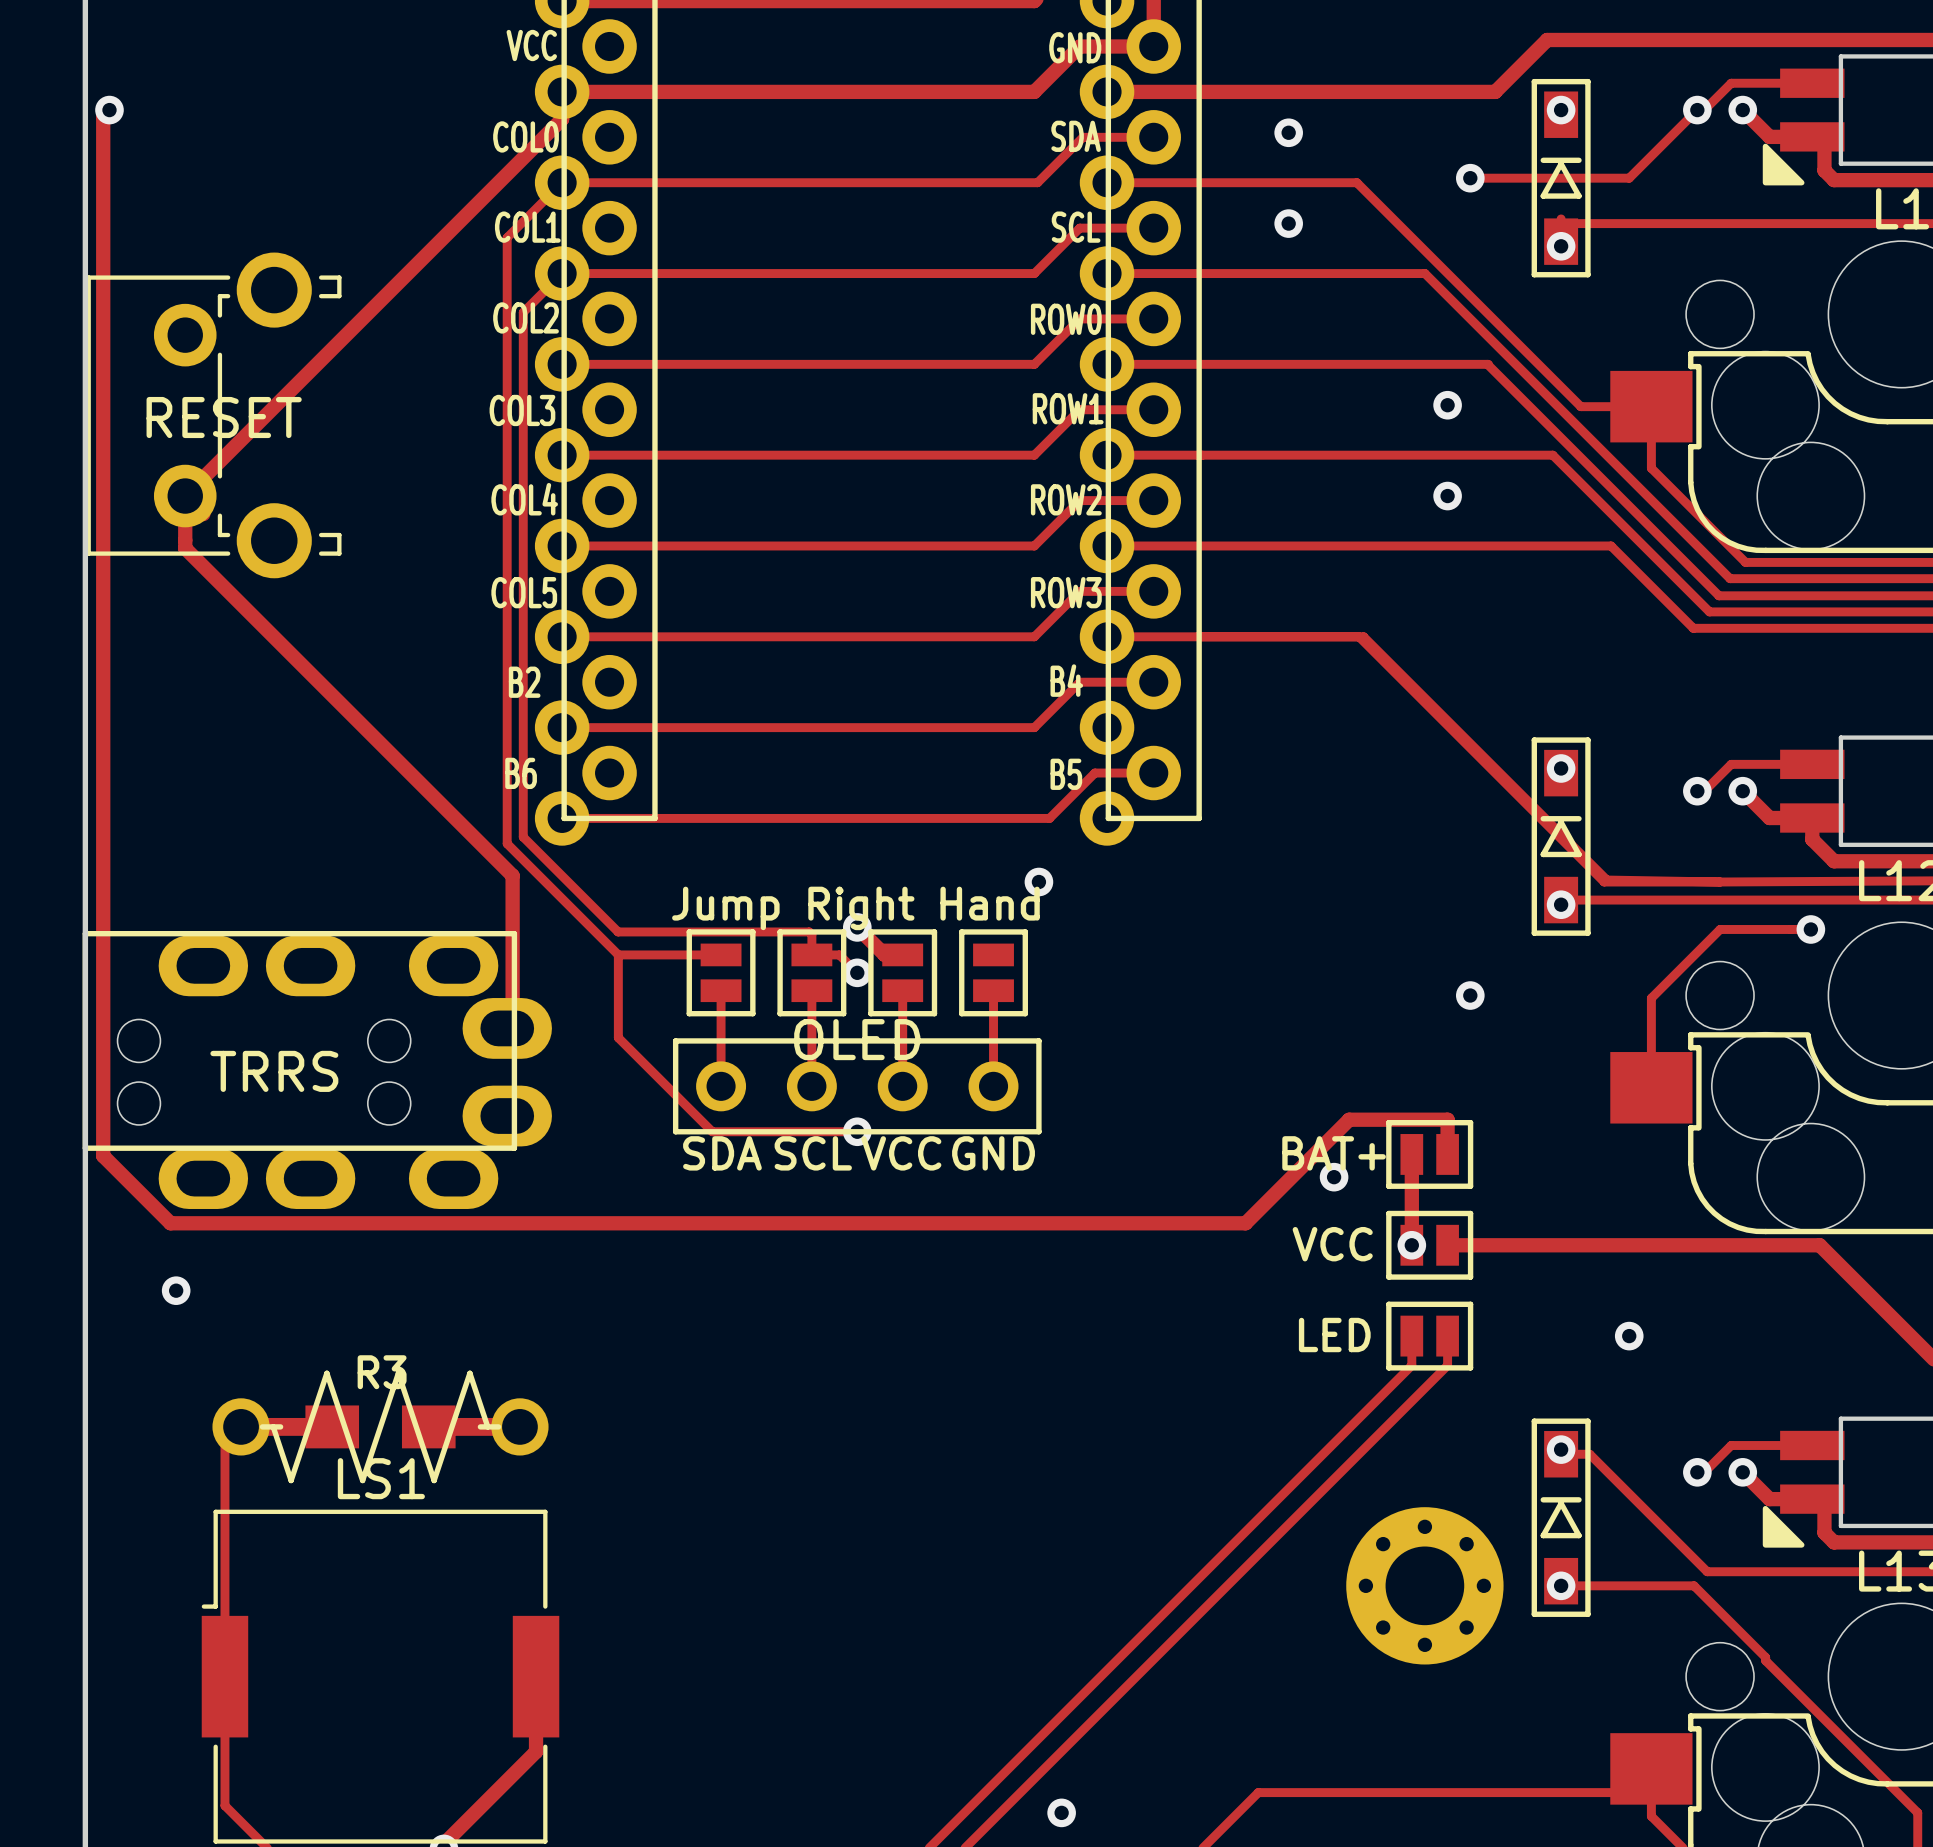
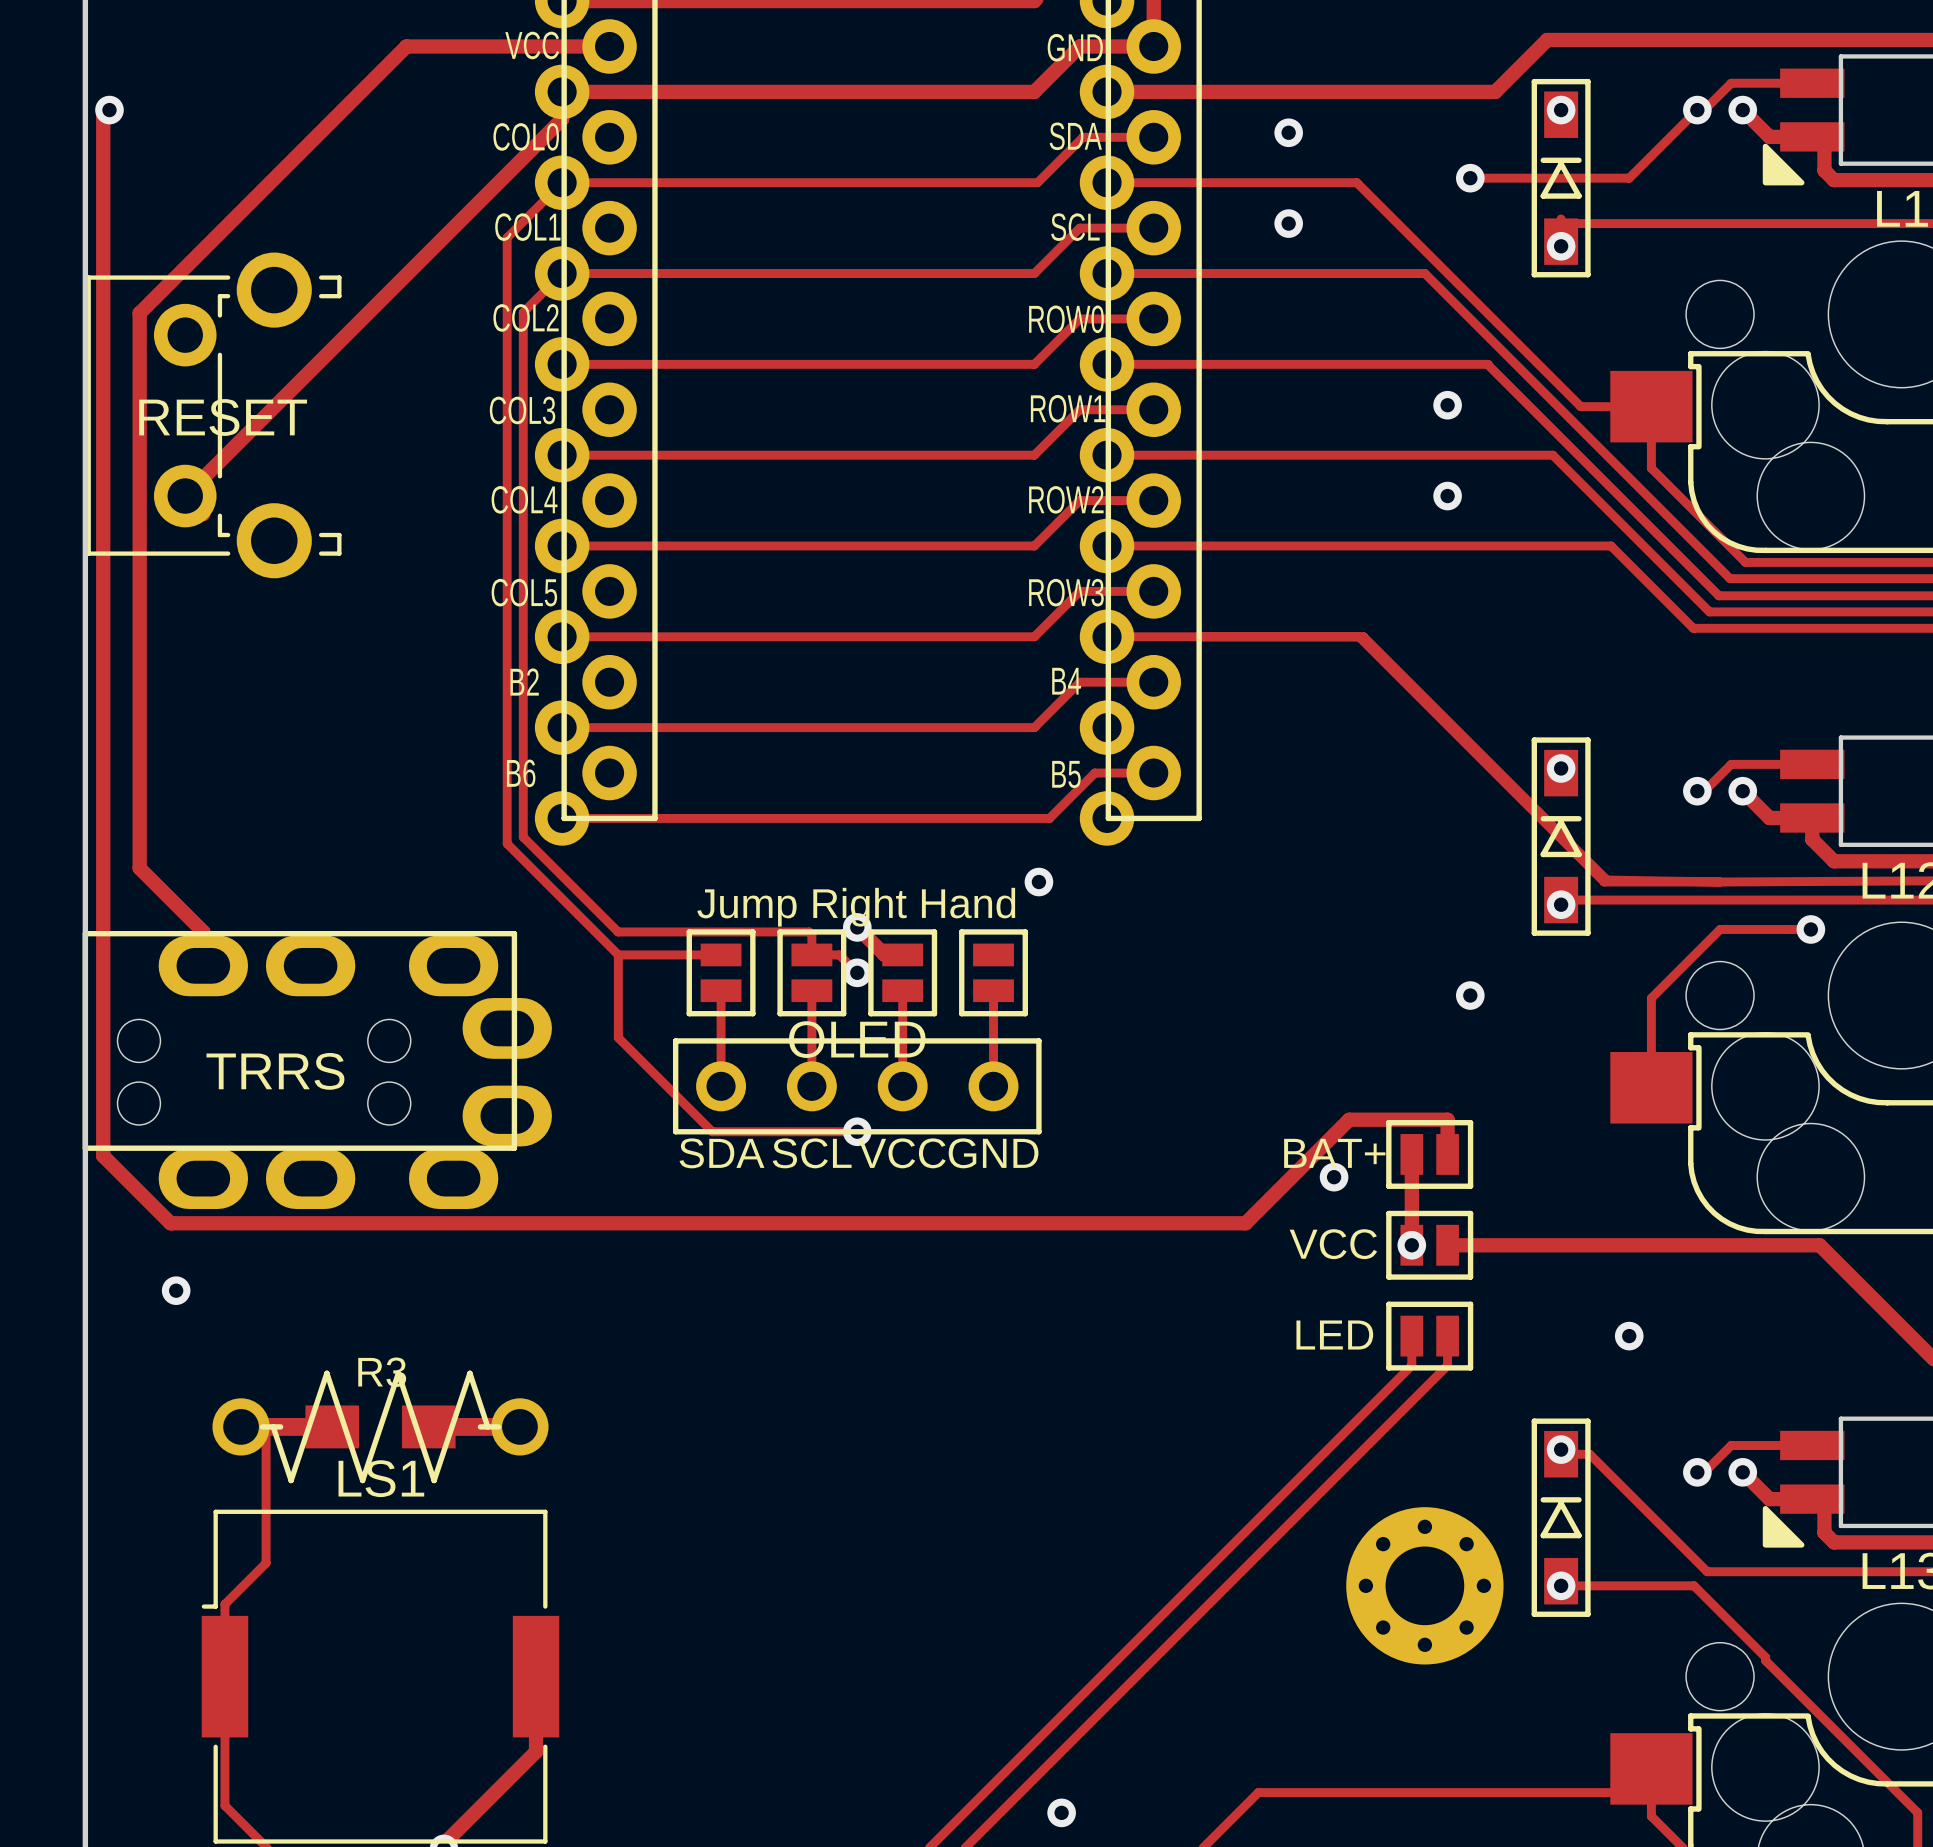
track: none -> (609, 46) (406, 46) (139, 313) (139, 868) (203, 931) (203, 965)
track: (185, 496) (185, 548) (512, 875) (512, 1023) (507, 1028) -> none
track: (241, 1426) (224, 1443) (224, 1604) -> (266, 1426) (266, 1563) (224, 1604)

